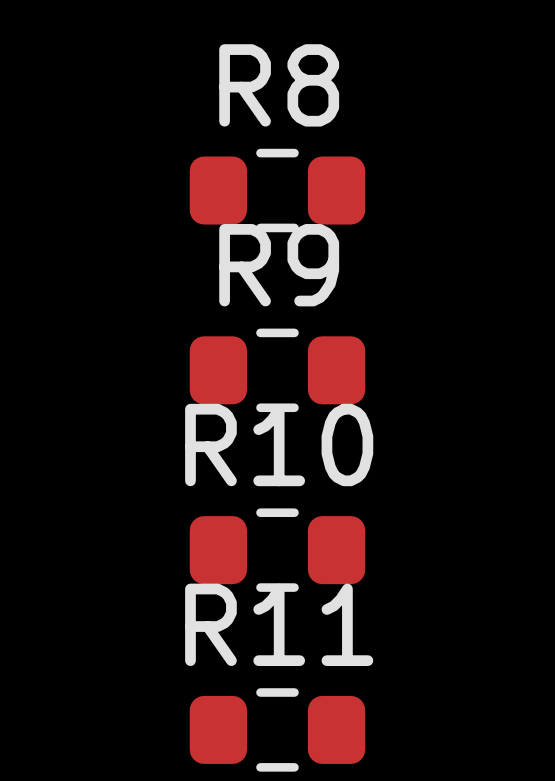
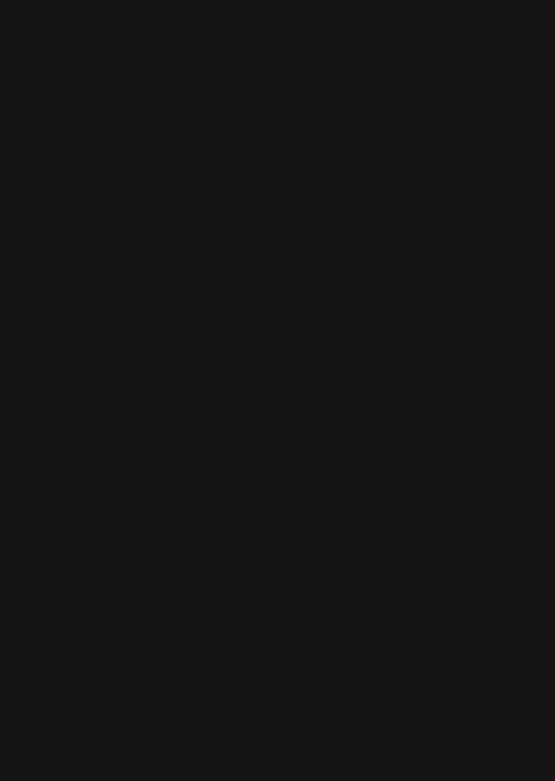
R8: (277, 190) -> none
R9: (277, 370) -> none
R10: (277, 550) -> none
R11: (277, 729) -> none

